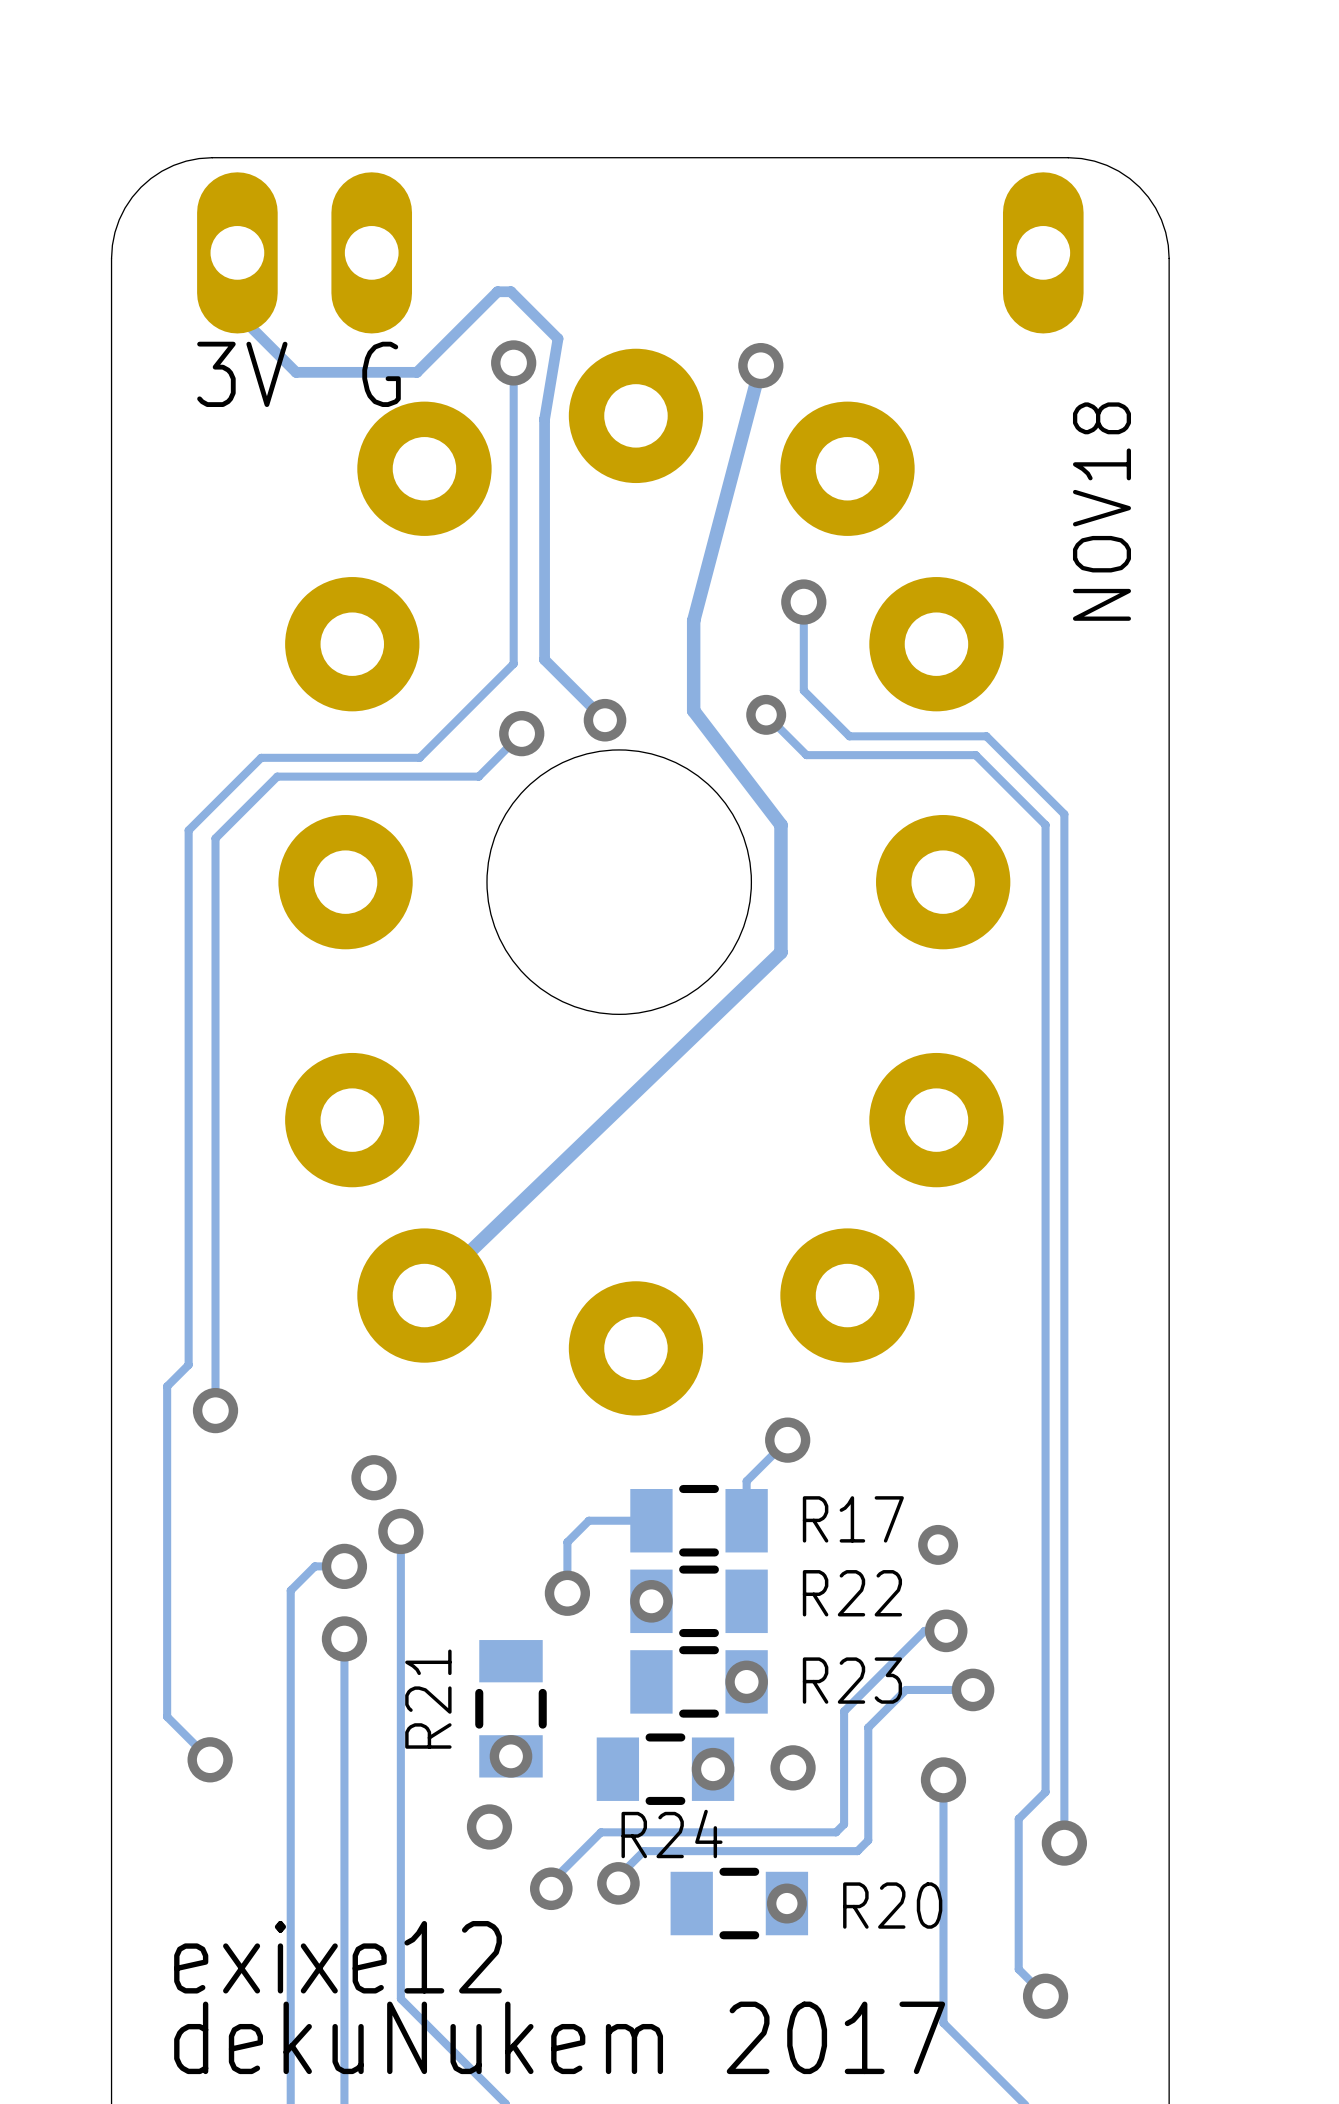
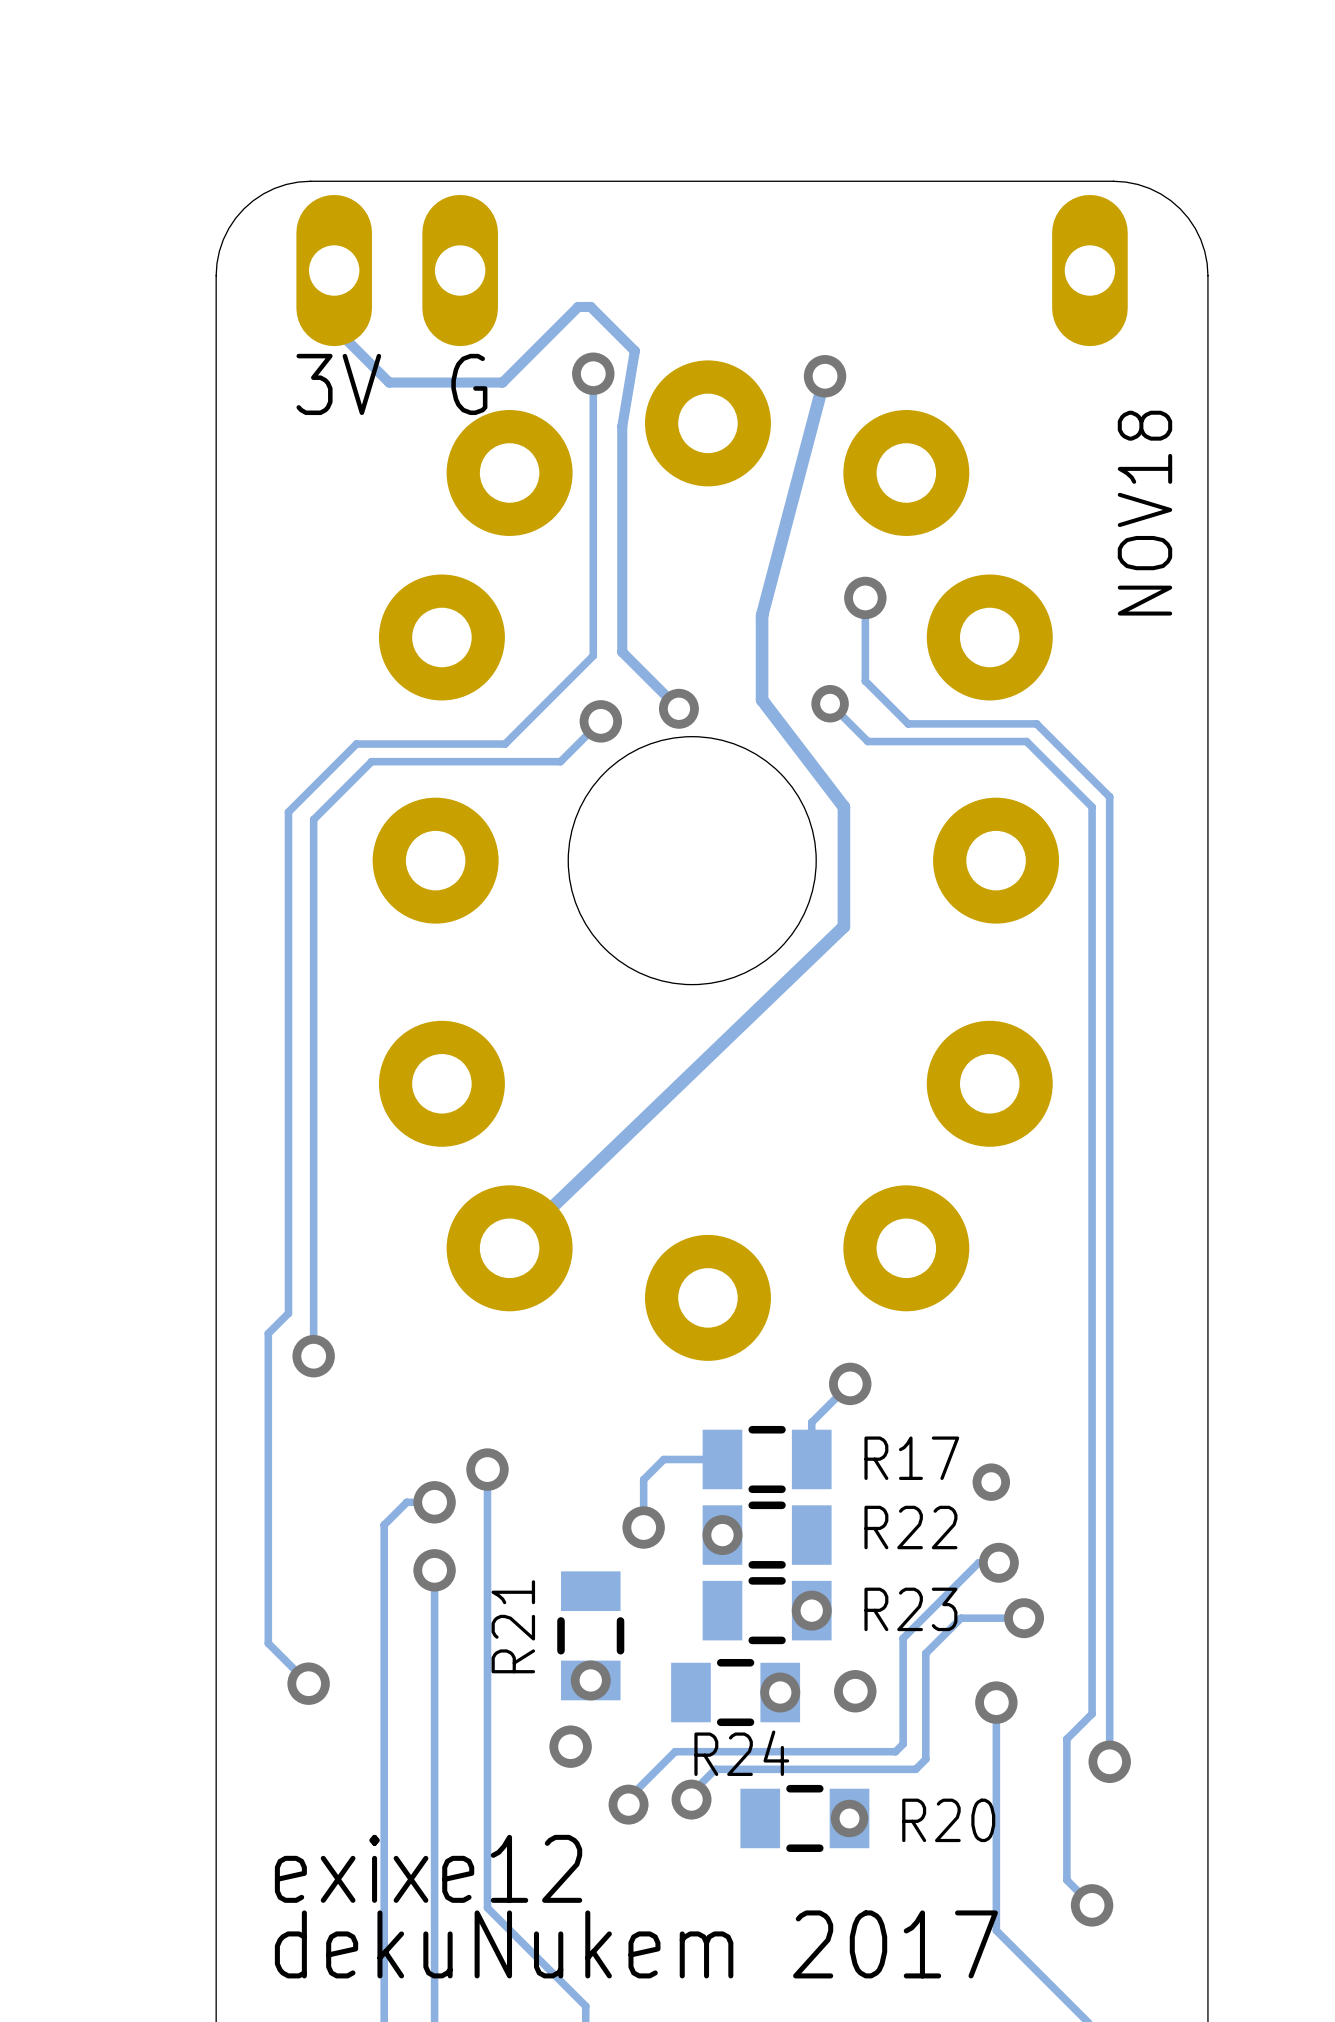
via: (373, 1477) -> none

